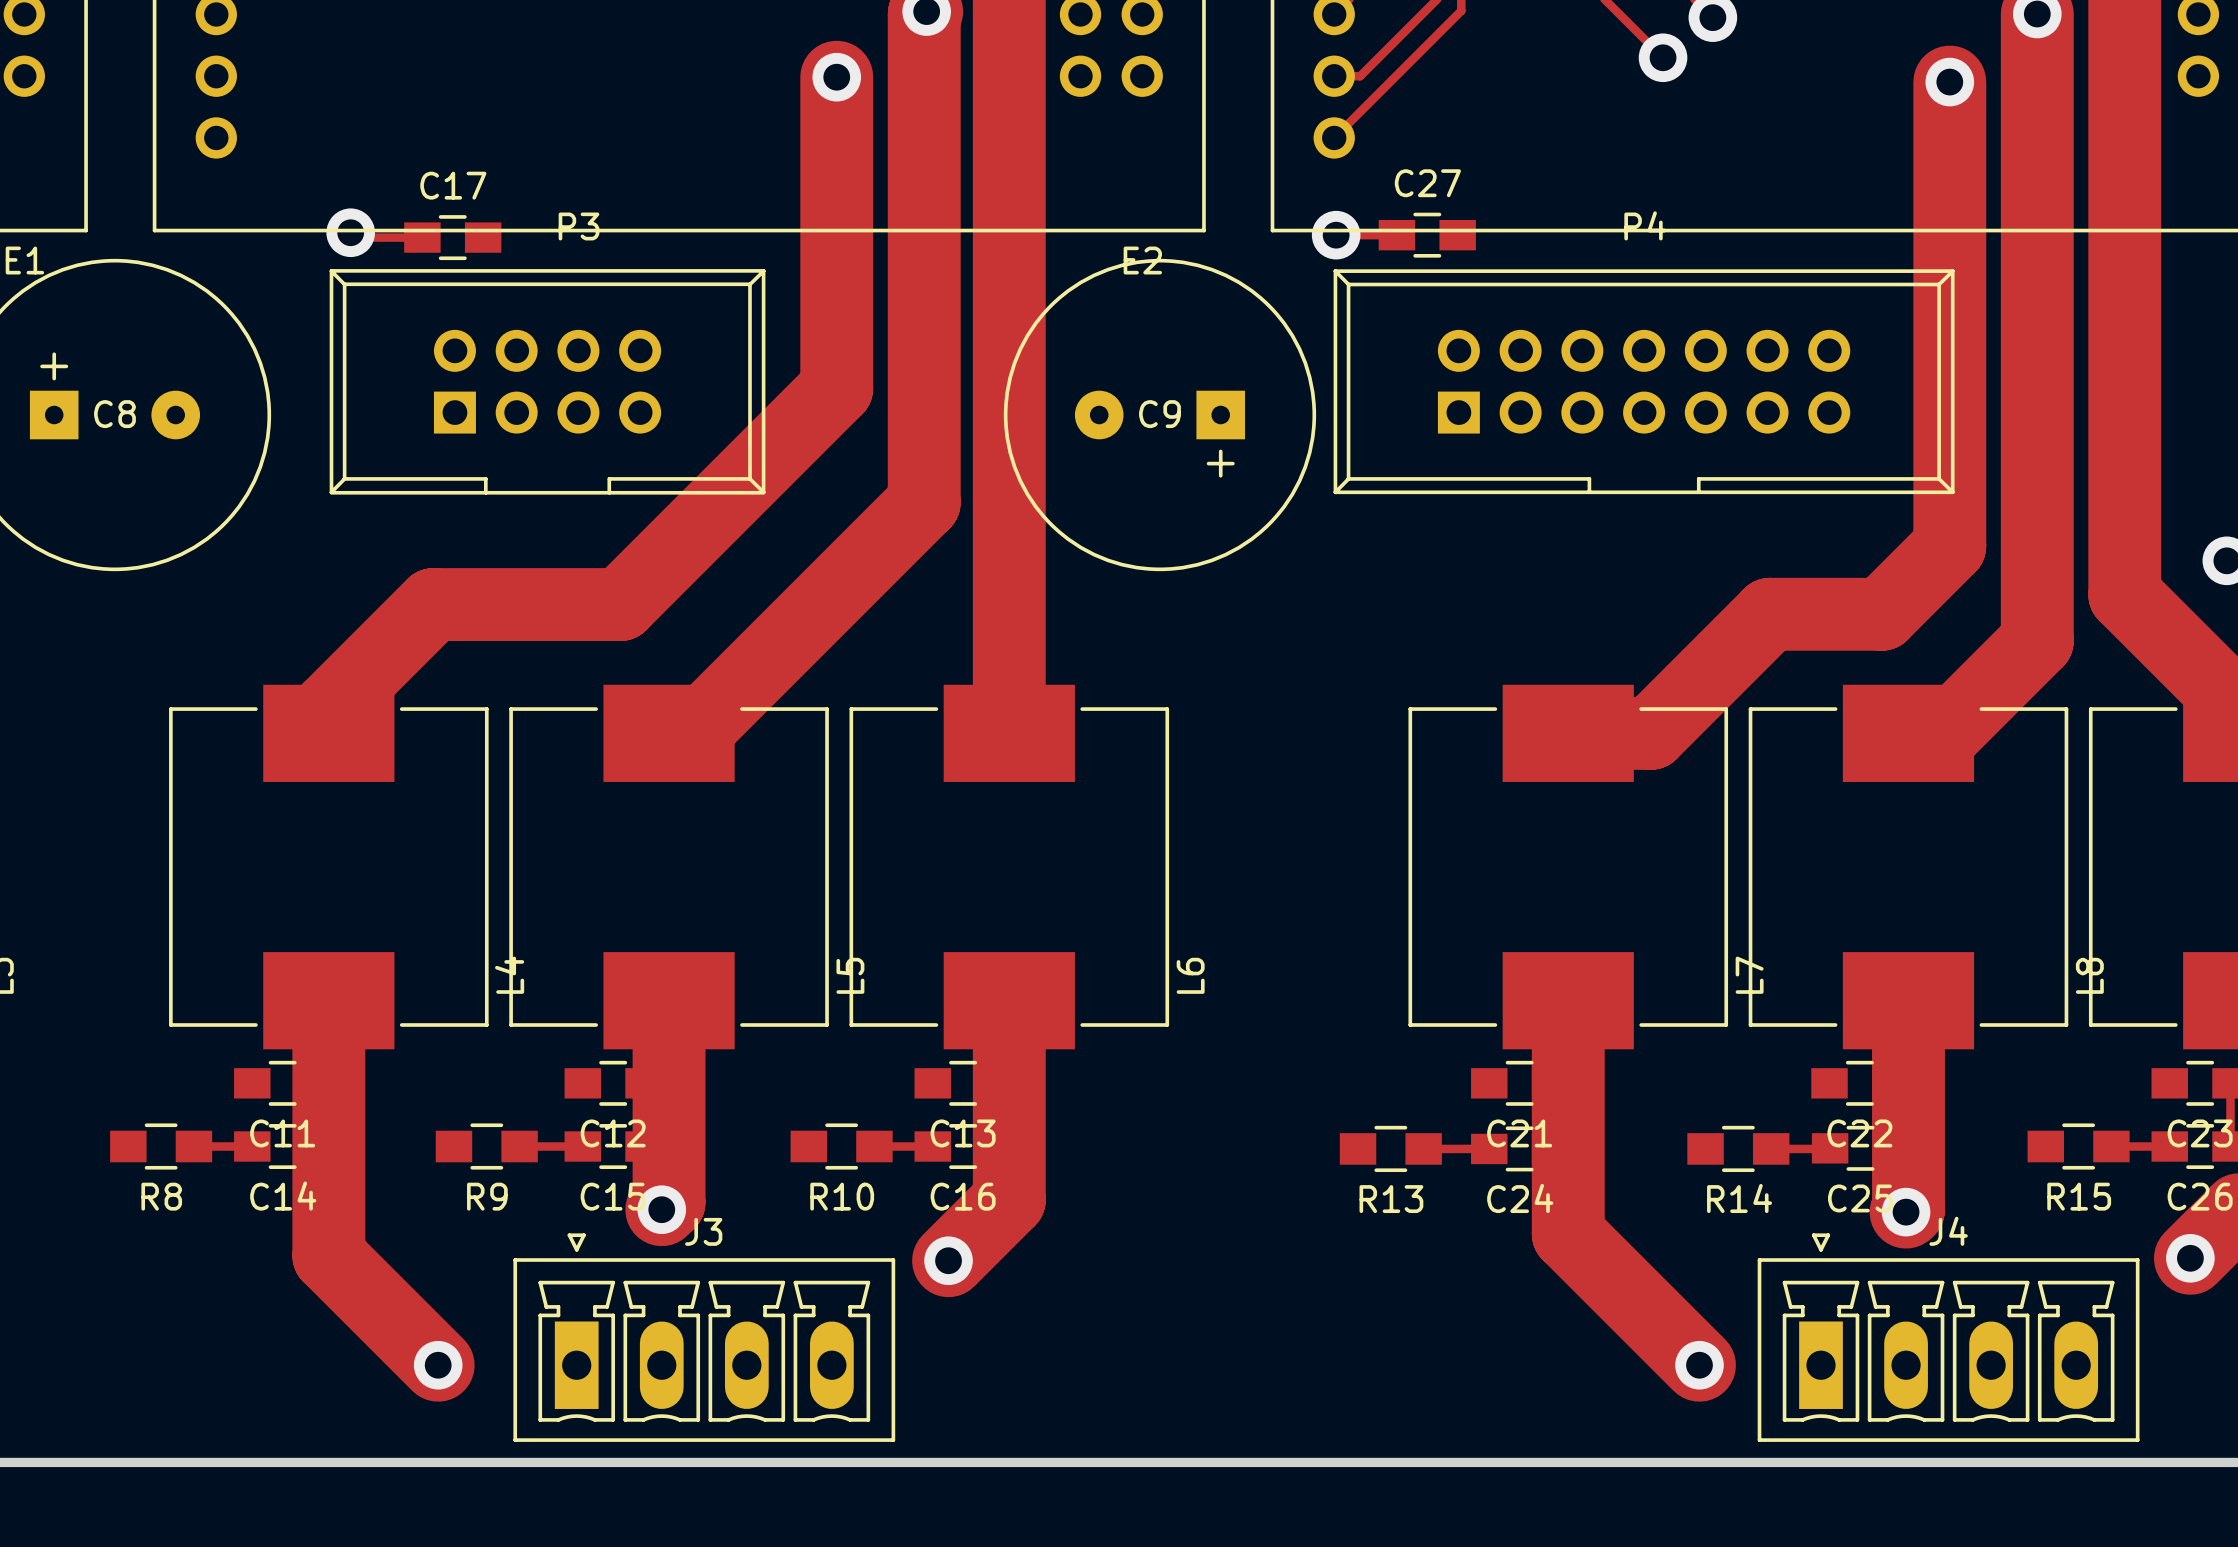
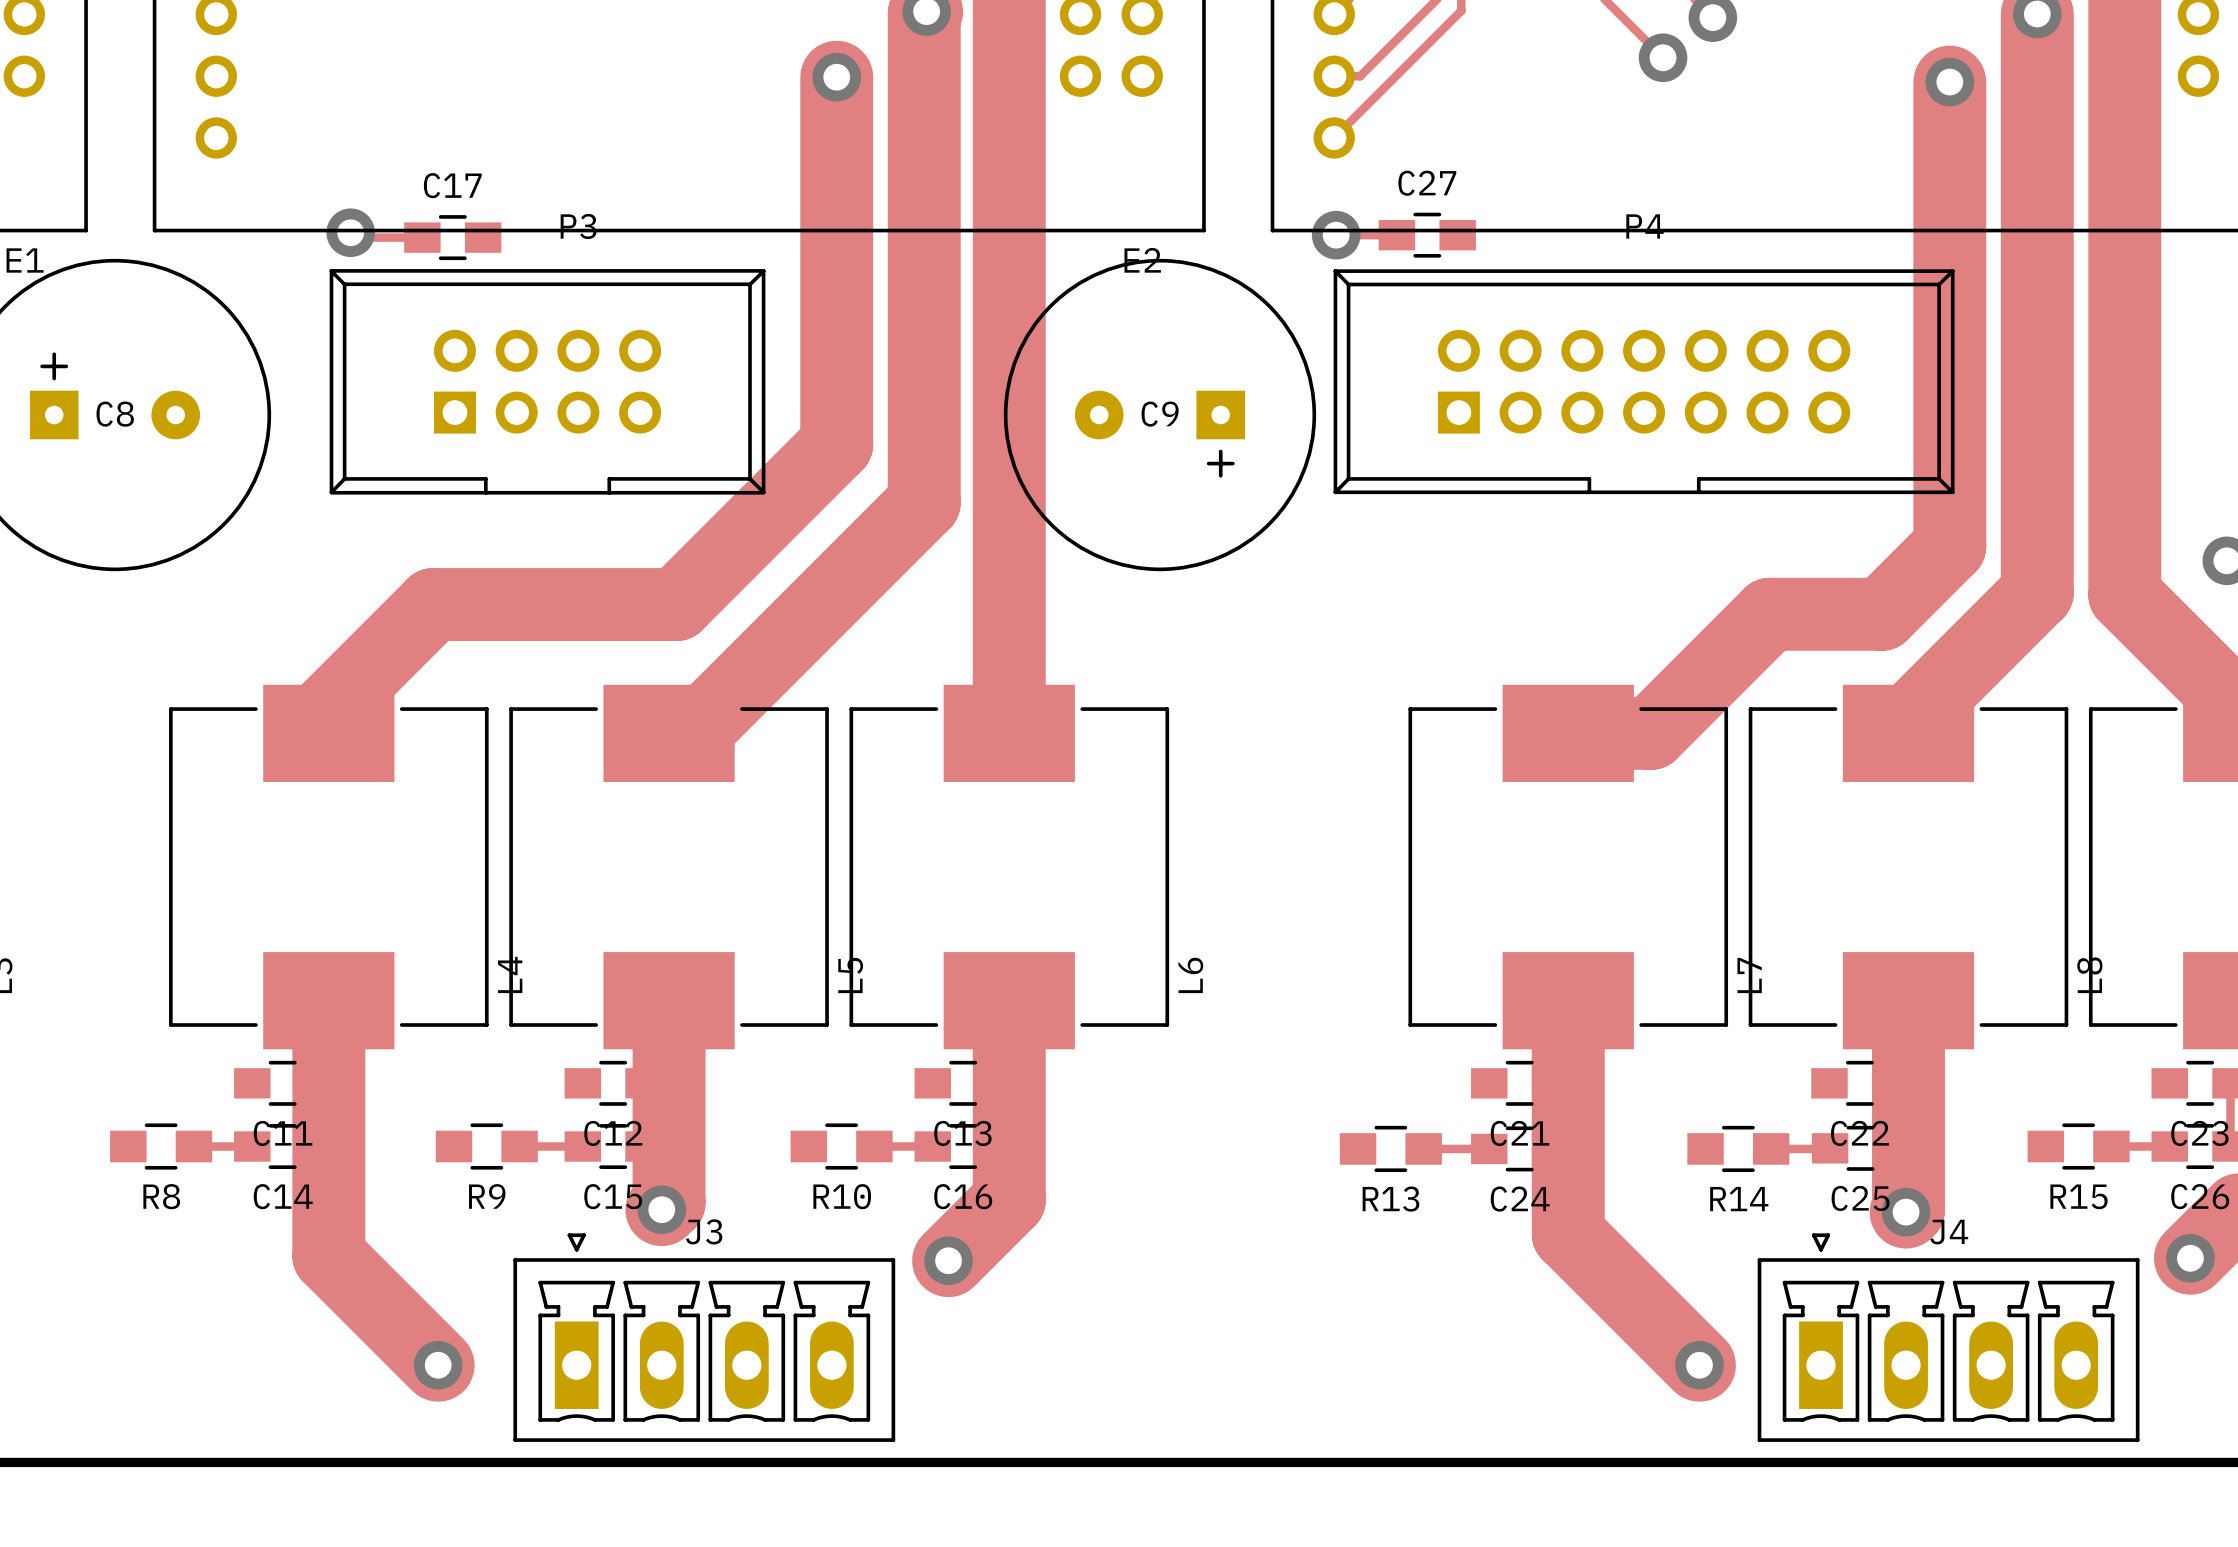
track: (836, 388) (620, 604) -> (836, 388) (836, 444) (676, 604) (620, 604)
track: (2037, 592) (2037, 641) (1944, 733) (1908, 733) -> (2037, 592) (1896, 733) (1908, 733)

